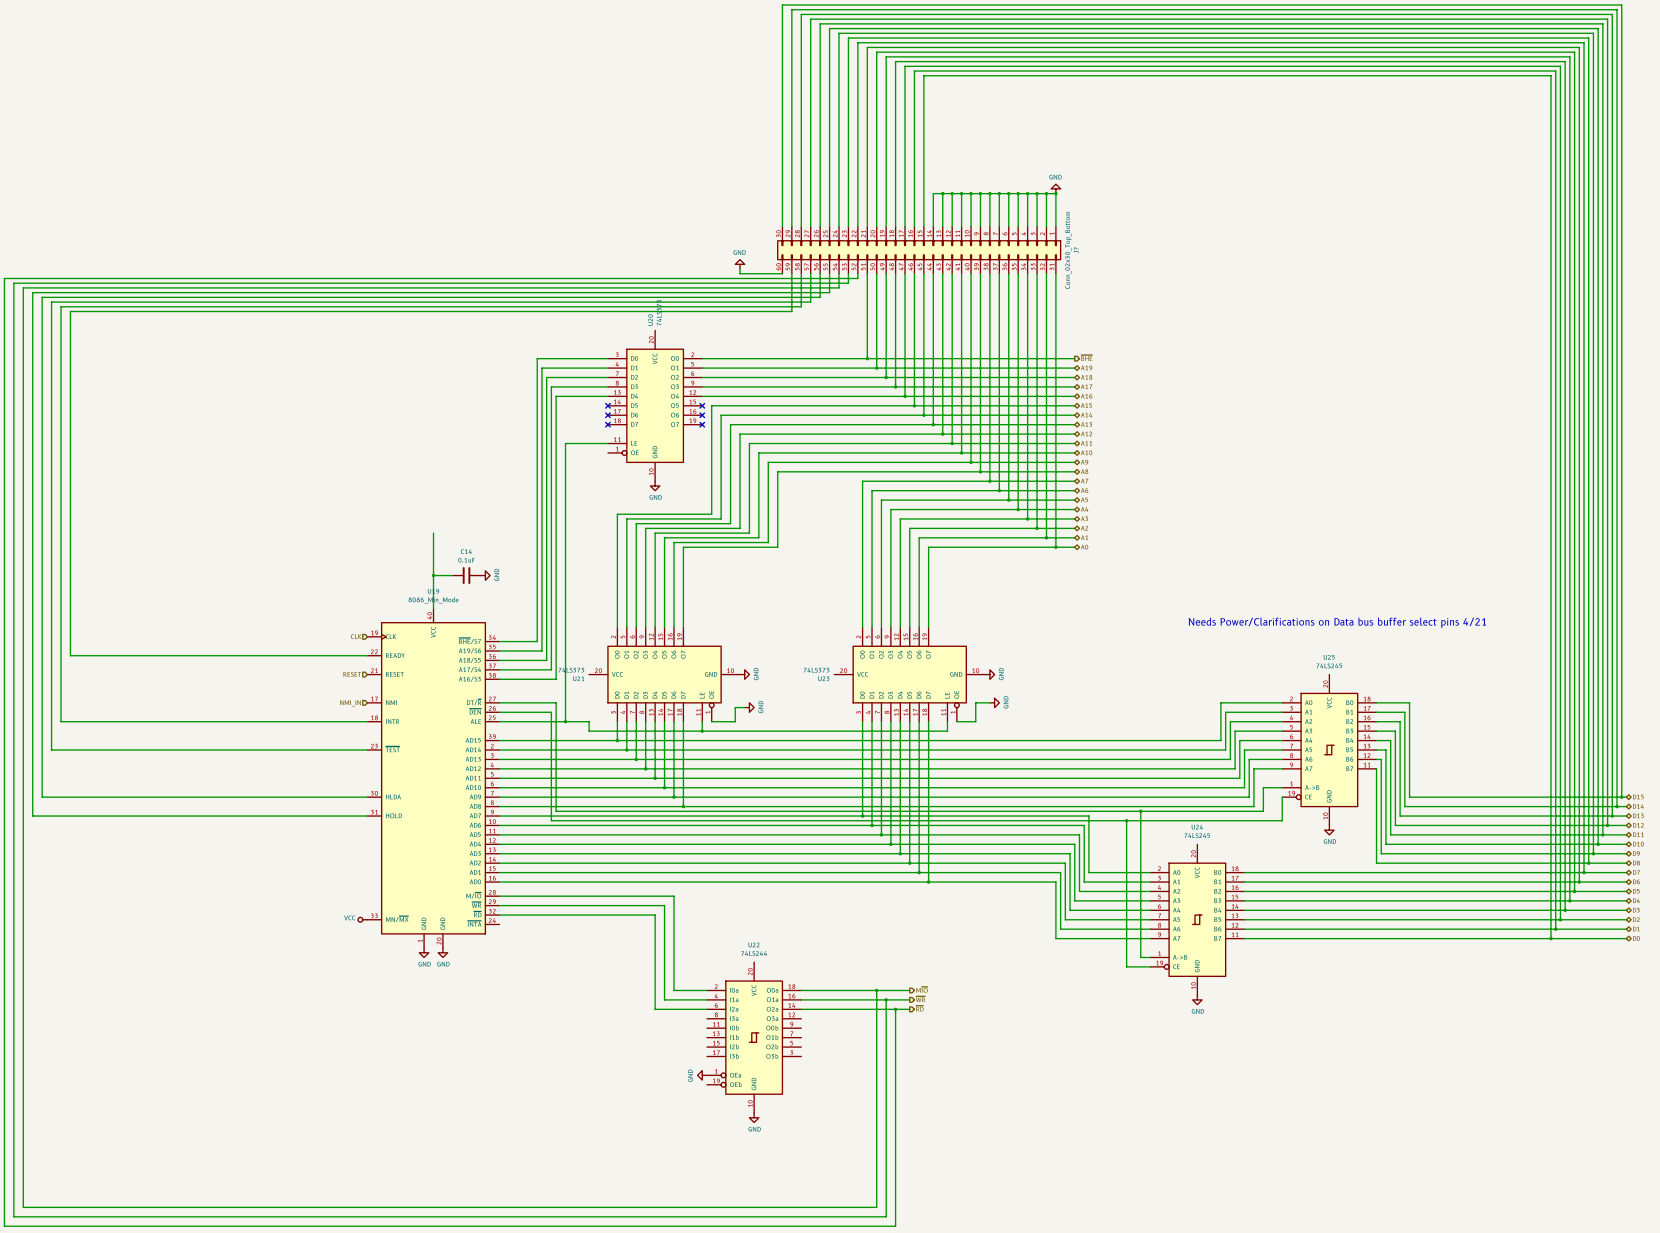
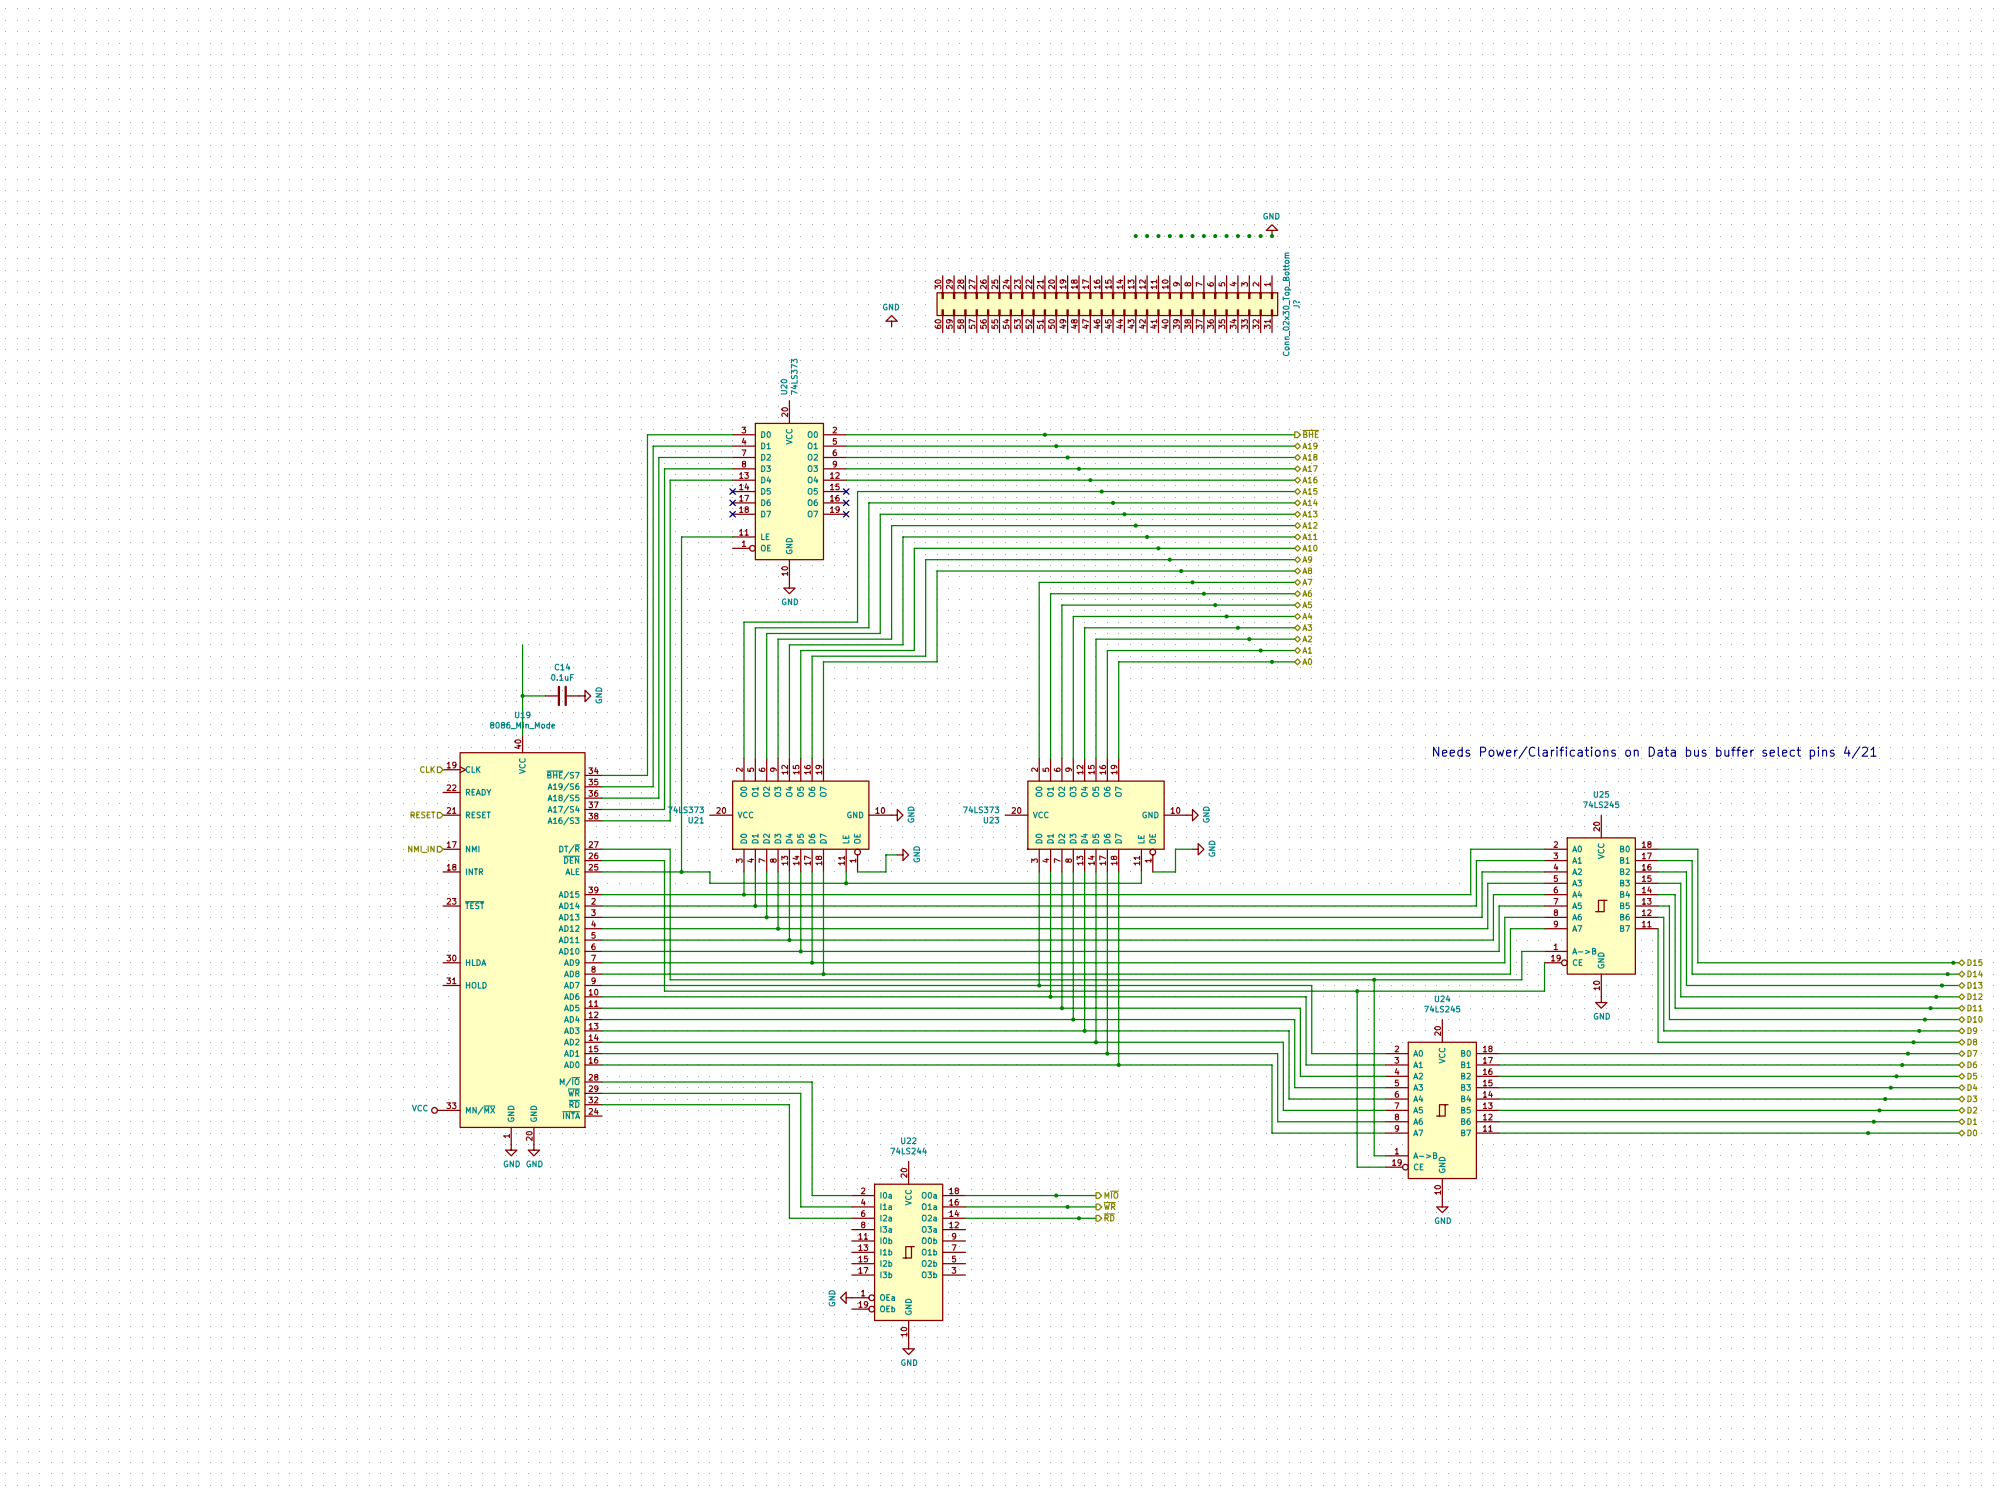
wire: (942, 193) (942, 226) -> none
wire: (952, 193) (952, 226) -> none
wire: (961, 193) (961, 226) -> none
wire: (971, 193) (971, 226) -> none
wire: (980, 193) (980, 226) -> none
wire: (989, 193) (989, 226) -> none
wire: (999, 193) (999, 226) -> none
wire: (1008, 193) (1008, 226) -> none
wire: (1018, 193) (1018, 226) -> none
wire: (1027, 193) (1027, 226) -> none
wire: (1037, 193) (1037, 226) -> none
wire: (1046, 193) (1046, 226) -> none
wire: (782, 226) (782, 5) (1621, 5) (1621, 797) -> none
wire: (791, 226) (791, 9) (1617, 9) (1617, 806) -> none
wire: (801, 226) (801, 14) (1612, 14) (1612, 816) -> none
wire: (810, 226) (810, 19) (1607, 19) (1607, 825) -> none
wire: (820, 226) (820, 23) (1602, 23) (1602, 834) -> none
wire: (829, 226) (829, 28) (1598, 28) (1598, 844) -> none
wire: (839, 226) (839, 33) (1593, 33) (1593, 853) -> none
wire: (848, 226) (848, 38) (1588, 38) (1588, 863) -> none
wire: (857, 226) (857, 42) (1584, 42) (1584, 872) -> none
wire: (867, 226) (867, 47) (1579, 47) (1579, 882) -> none
wire: (876, 226) (876, 52) (1574, 52) (1574, 891) -> none
wire: (886, 226) (886, 56) (1569, 56) (1569, 900) -> none
wire: (895, 226) (895, 61) (1565, 61) (1565, 910) -> none
wire: (905, 226) (905, 66) (1560, 66) (1560, 919) -> none
wire: (914, 226) (914, 71) (1555, 71) (1555, 929) -> none
wire: (923, 226) (923, 75) (1551, 75) (1551, 938) -> none
wire: (933, 226) (933, 193) (1055, 193) (1055, 226) -> none
wire: (739, 269) (739, 273) (782, 273) -> none
wire: (791, 273) (791, 311) (70, 311) (70, 655) (367, 655) -> none
wire: (801, 273) (801, 306) (61, 306) (61, 721) (367, 721) -> none
wire: (810, 273) (810, 302) (51, 302) (51, 750) (367, 750) -> none
wire: (820, 273) (820, 297) (42, 297) (42, 797) (367, 797) -> none
wire: (829, 273) (829, 292) (32, 292) (32, 816) (367, 816) -> none
wire: (839, 273) (839, 287) (23, 287) (23, 1207) (876, 1207) (876, 990) -> none
wire: (848, 273) (848, 283) (13, 283) (13, 1216) (886, 1216) (886, 999) -> none
wire: (857, 273) (857, 278) (4, 278) (4, 1226) (895, 1226) (895, 1009) -> none
wire: (867, 273) (867, 358) -> none
wire: (876, 273) (876, 368) -> none
wire: (886, 273) (886, 377) -> none
wire: (895, 273) (895, 386) -> none
wire: (905, 273) (905, 396) -> none
wire: (914, 273) (914, 405) -> none
wire: (923, 273) (923, 415) -> none
wire: (933, 273) (933, 424) -> none
wire: (942, 273) (942, 434) -> none
wire: (952, 273) (952, 443) -> none
wire: (961, 273) (961, 452) -> none
wire: (971, 273) (971, 462) -> none
wire: (980, 273) (980, 471) -> none
wire: (989, 273) (989, 481) -> none
wire: (999, 273) (999, 490) -> none
wire: (1008, 273) (1008, 500) -> none
wire: (1018, 273) (1018, 509) -> none
wire: (1027, 273) (1027, 518) -> none
wire: (1037, 273) (1037, 528) -> none
wire: (1046, 273) (1046, 537) -> none
wire: (1055, 273) (1055, 547) -> none

